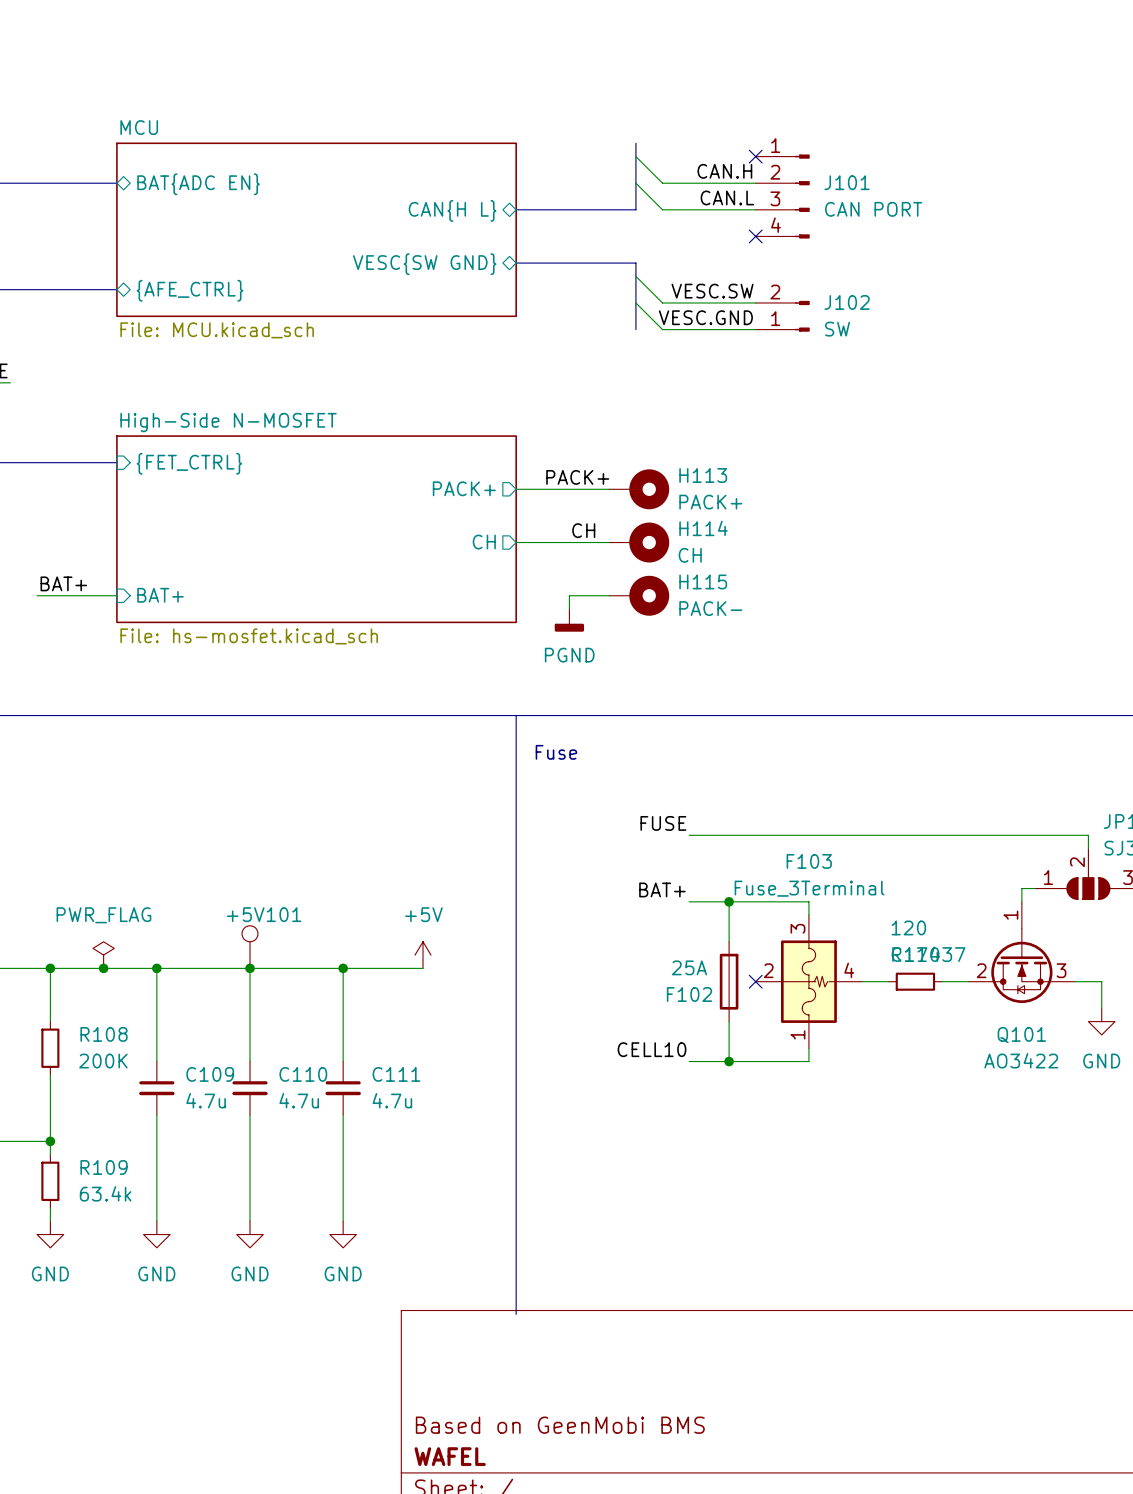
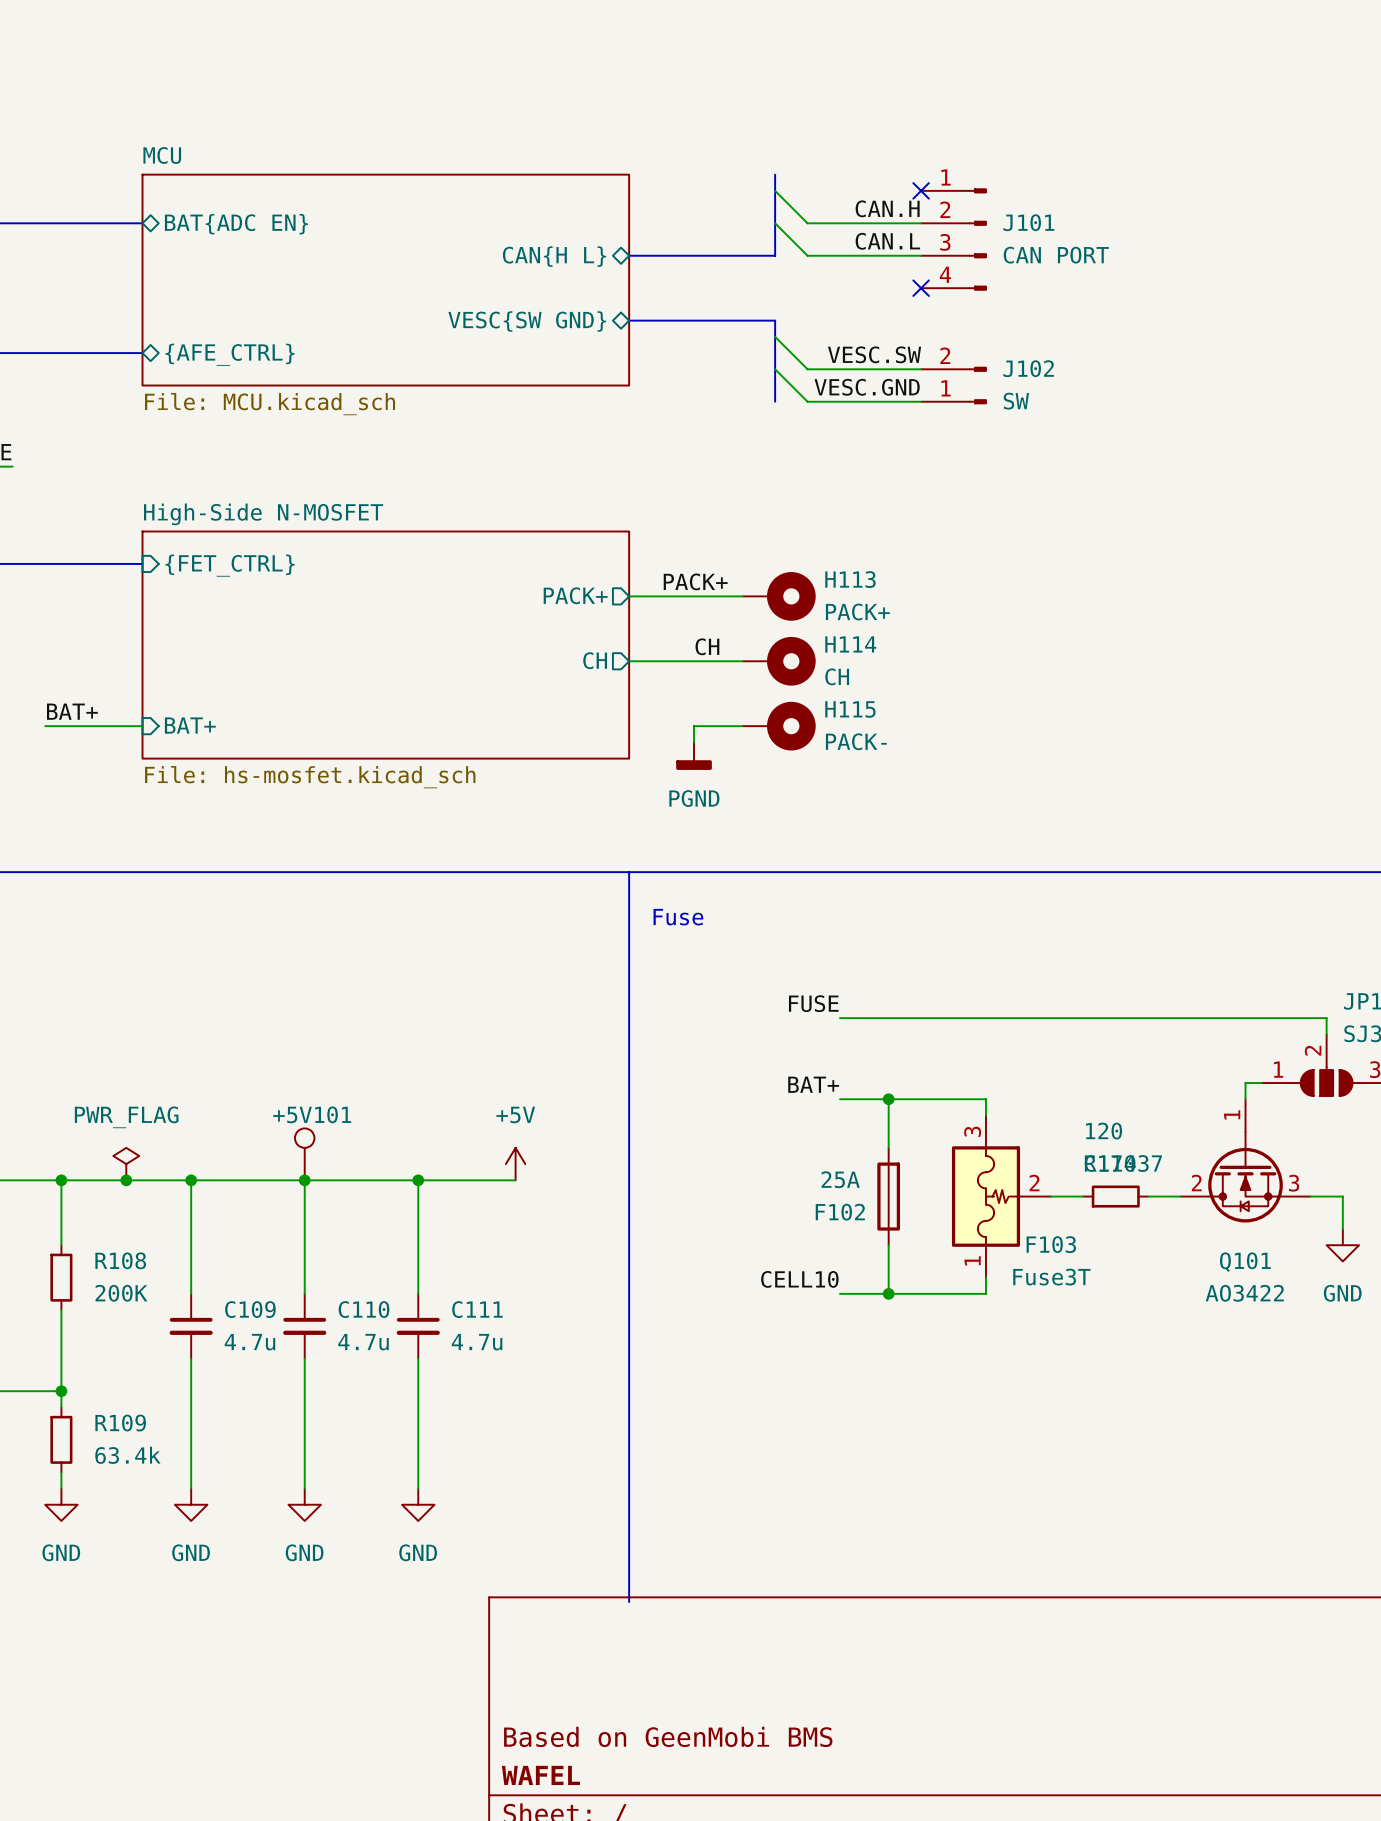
F103 name position: F103 (809, 861) -> F103 (1051, 1244)
F103 value: Fuse_3Terminal (809, 888) -> Fuse3T (1051, 1277)
F103 symbol: [755, 915, 863, 1049] -> [951, 1115, 1051, 1278]
no-connect mark: (755, 981) -> none

